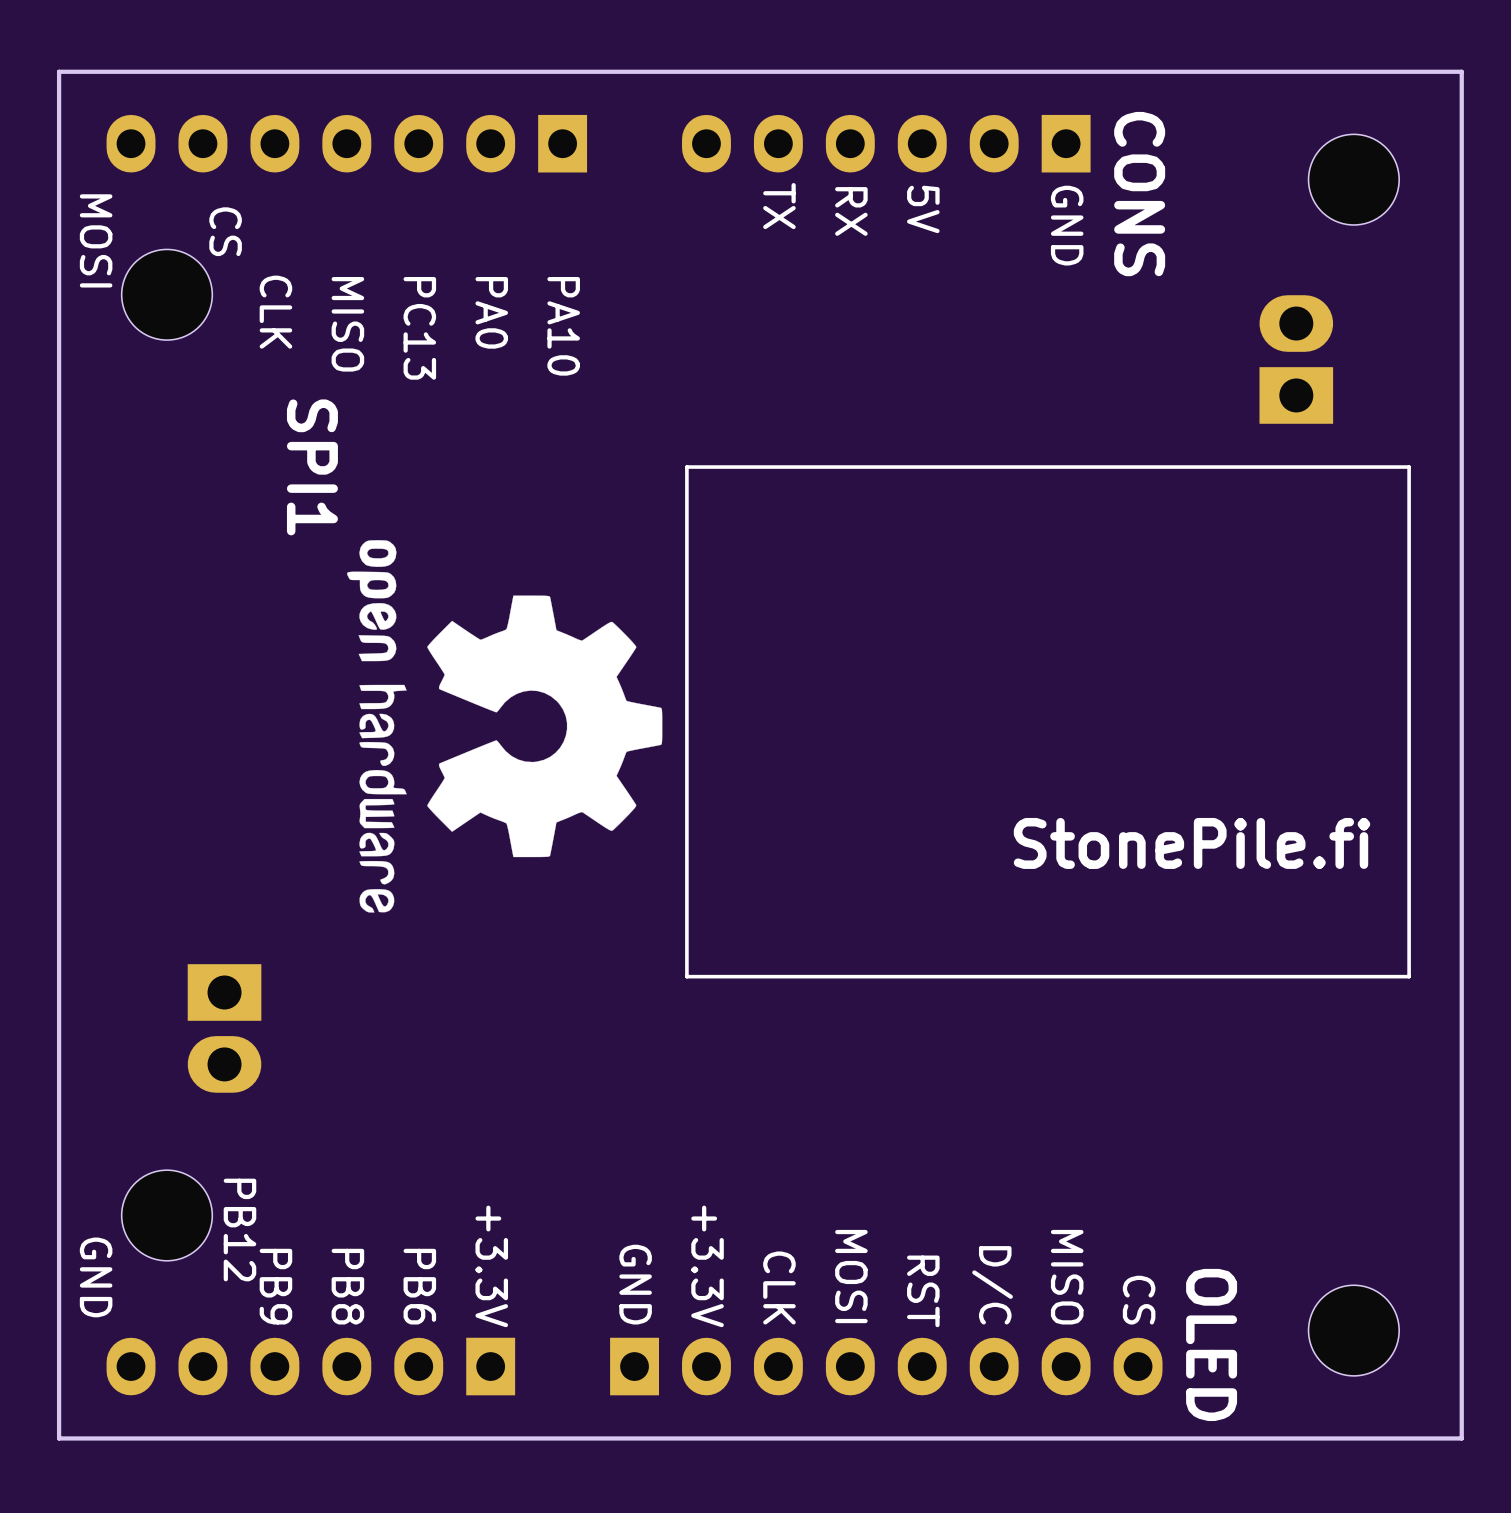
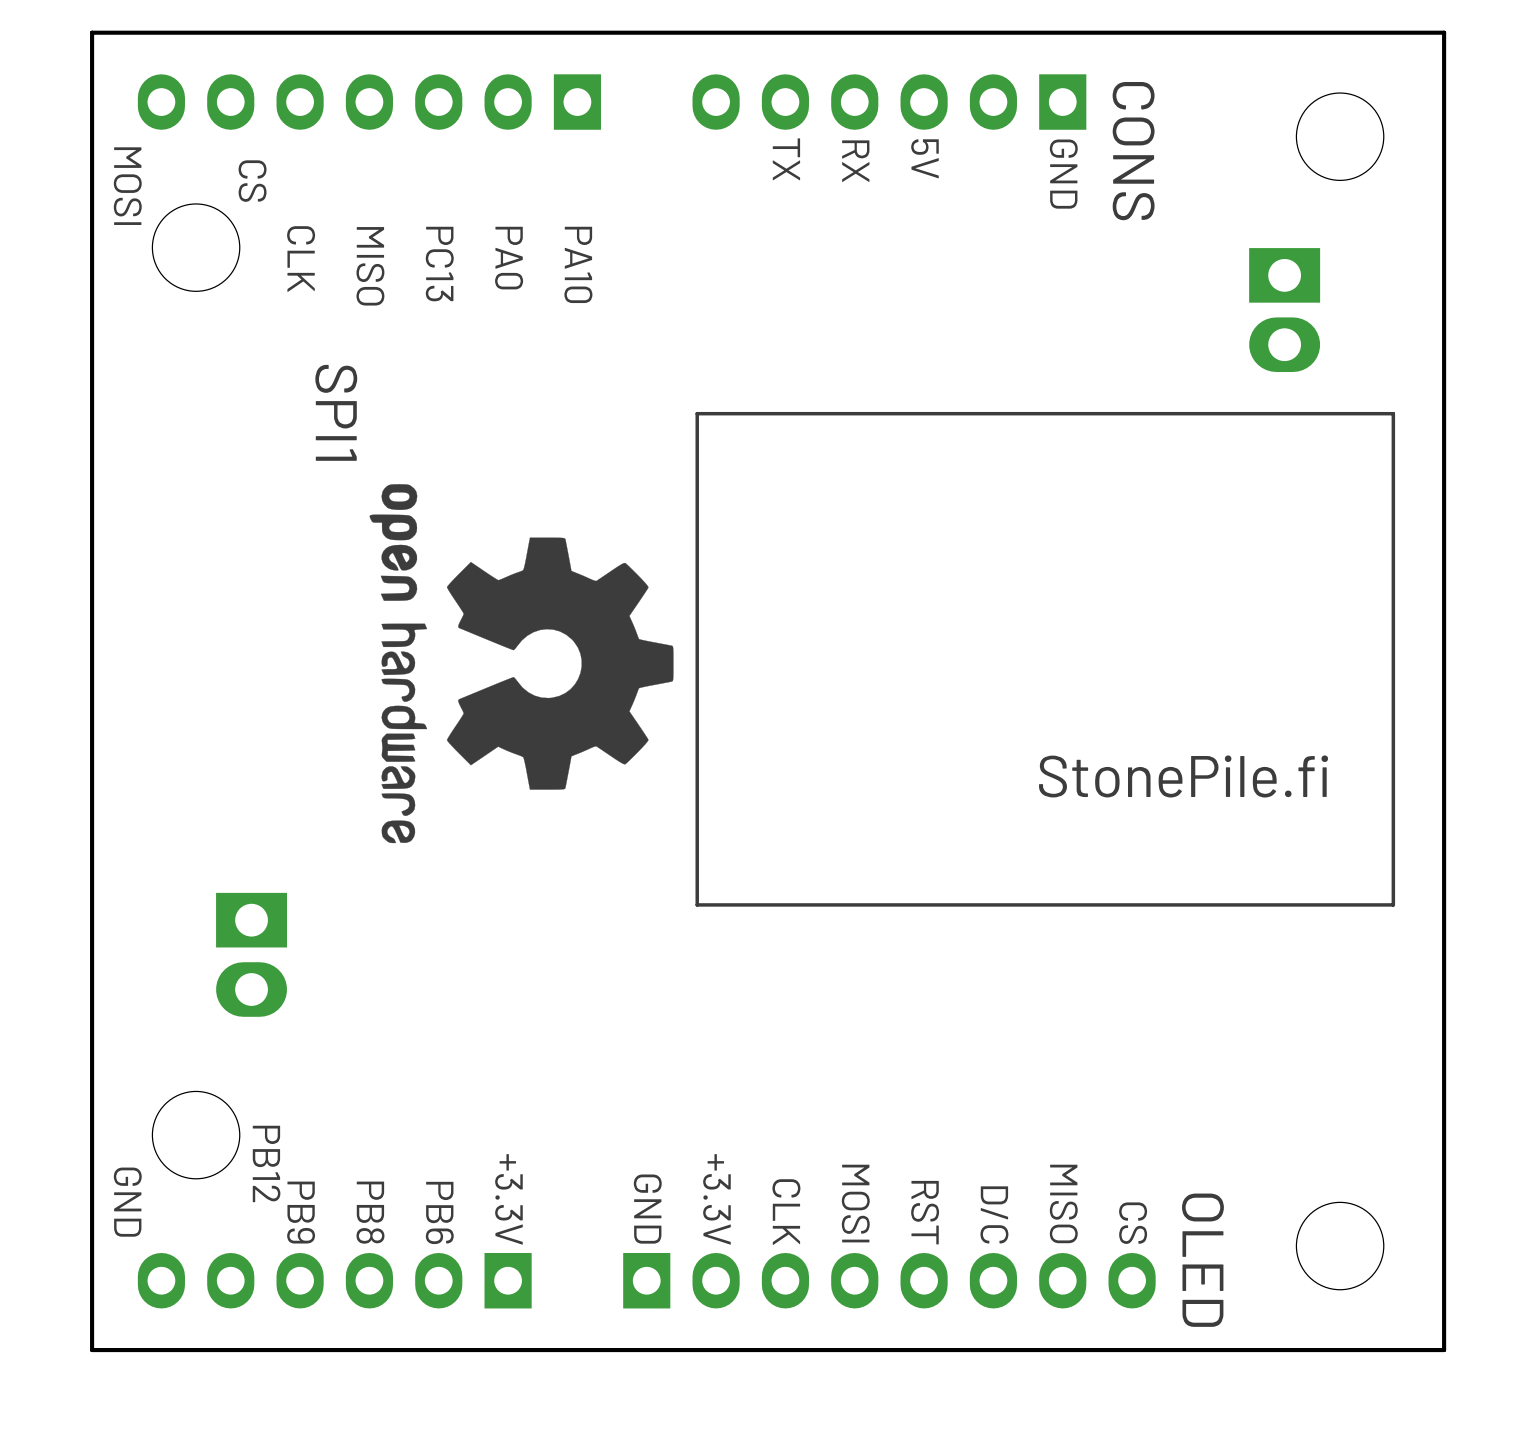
part rotation: 0° (1296, 359) -> 180° (1284, 310)

